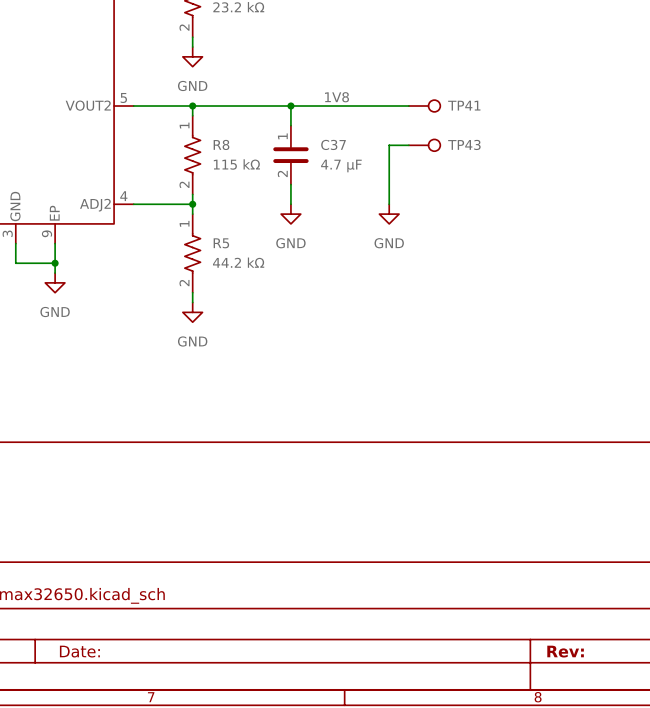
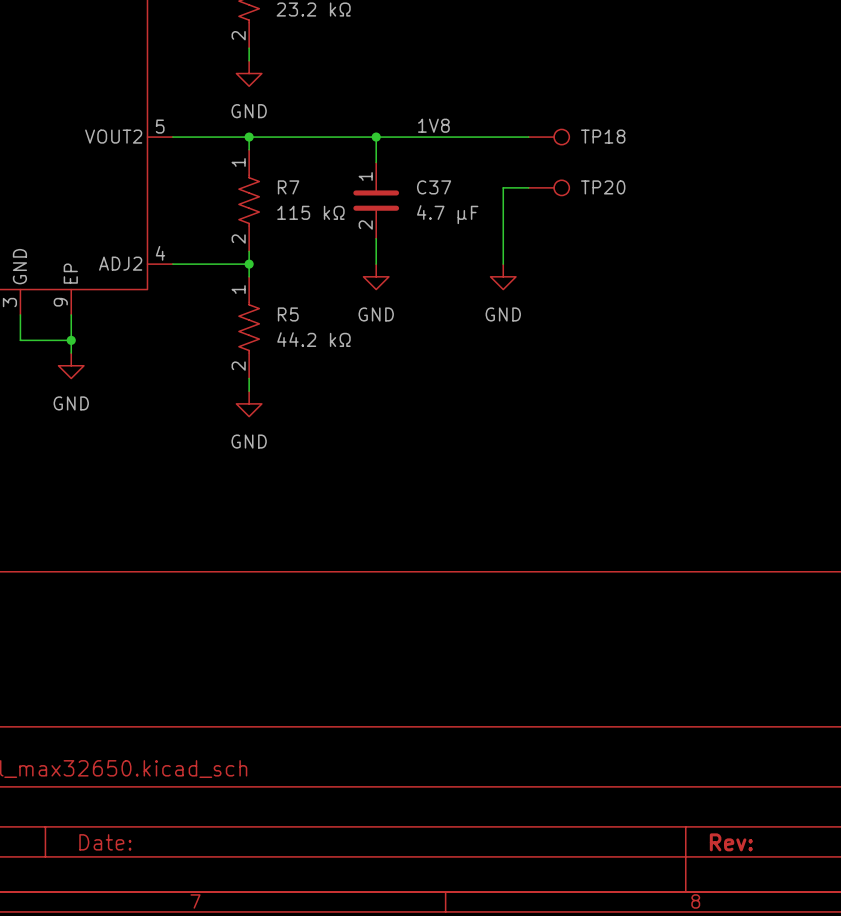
TP41 name: TP41 (464, 105) -> TP18 (603, 136)
R8 name: R8 (221, 144) -> R7 (288, 187)
TP43 name: TP43 (464, 144) -> TP20 (603, 187)

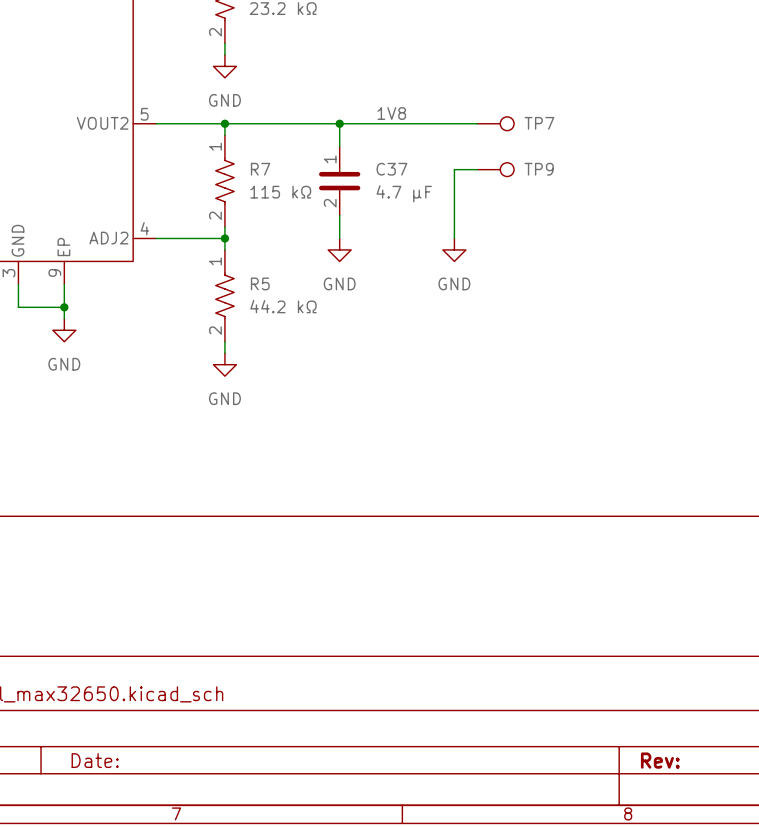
TP18 name: TP18 (603, 136) -> TP7 (539, 123)
TP20 name: TP20 (603, 187) -> TP9 (539, 169)

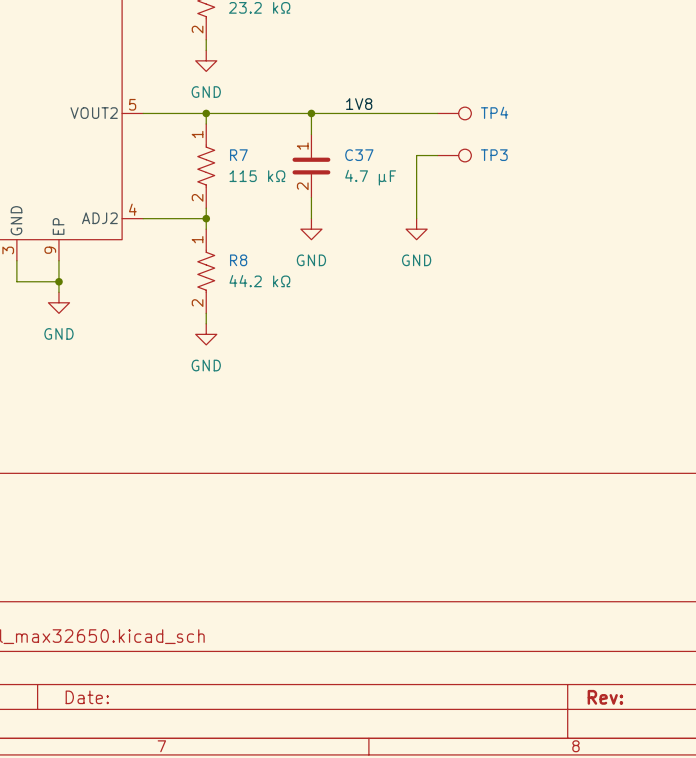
TP7 name: TP7 (539, 123) -> TP4 (494, 112)
TP9 name: TP9 (539, 169) -> TP3 (494, 155)
R5 name: R5 (260, 283) -> R8 (238, 260)

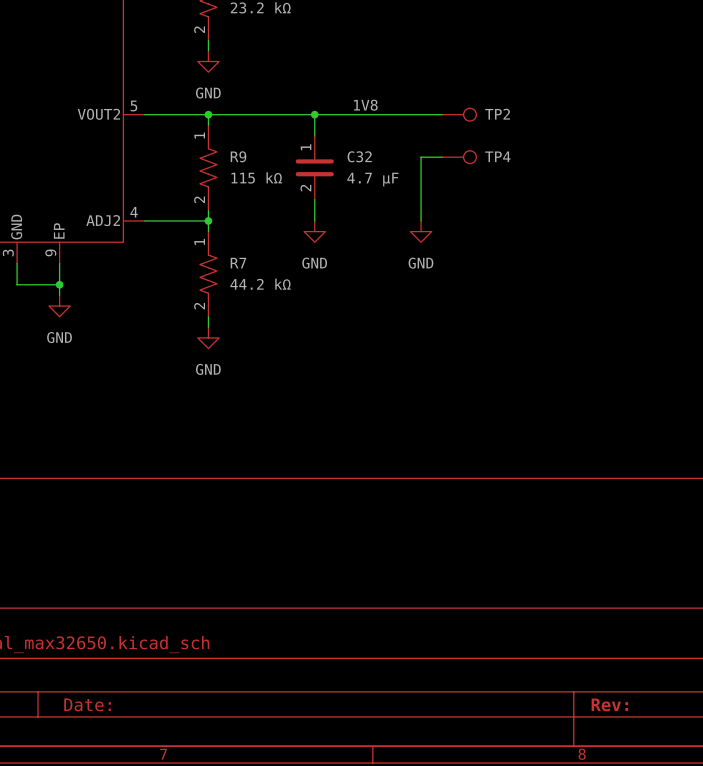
TP4 name: TP4 (494, 112) -> TP2 (497, 114)
R7 name: R7 (238, 155) -> R9 (238, 156)
C37 name: C37 (359, 155) -> C32 (359, 156)
TP3 name: TP3 (494, 155) -> TP4 (497, 156)
R8 name: R8 (238, 260) -> R7 (238, 263)

